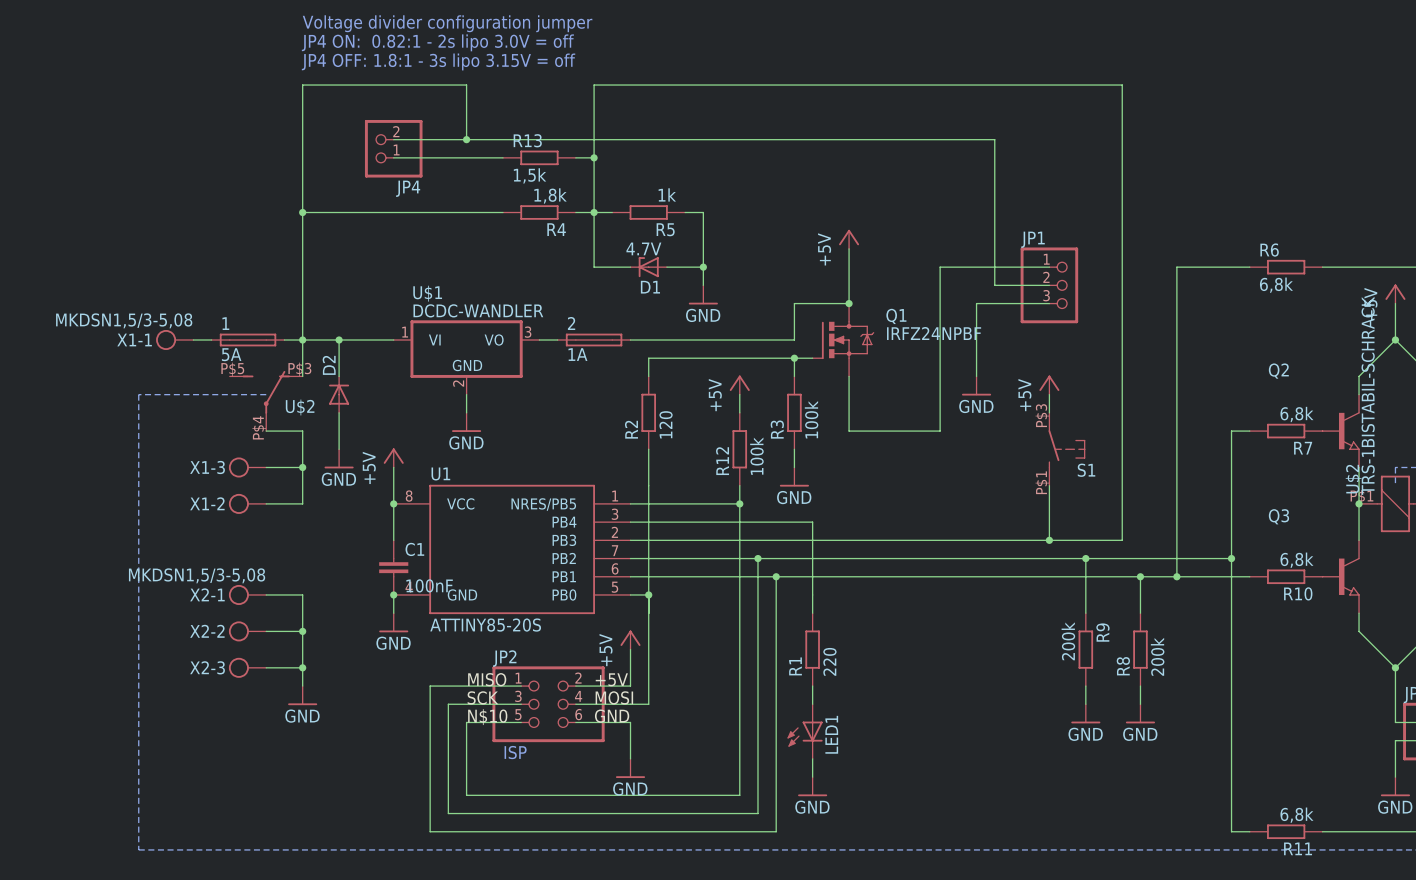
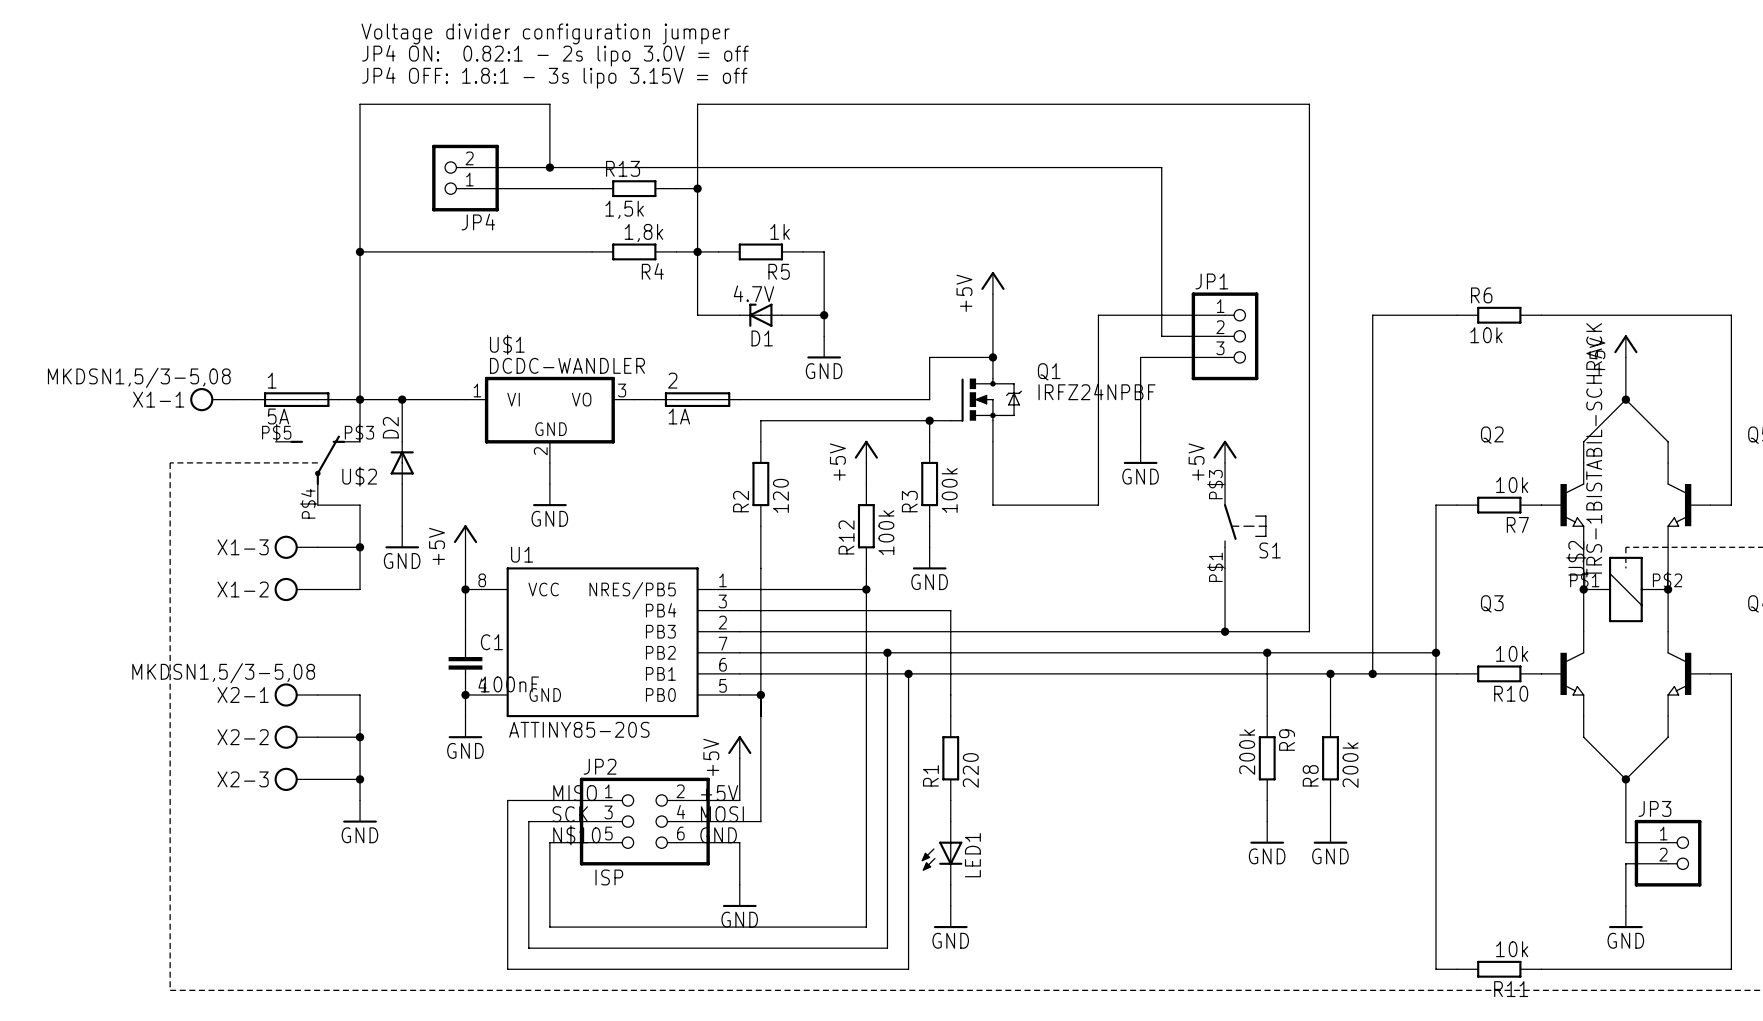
R6 value: 6,8k (1276, 285) -> 10k (1486, 335)
R7 value: 6,8k (1296, 414) -> 10k (1512, 485)
R10 value: 6,8k (1296, 560) -> 10k (1512, 653)
R11 value: 6,8k (1296, 815) -> 10k (1512, 949)

